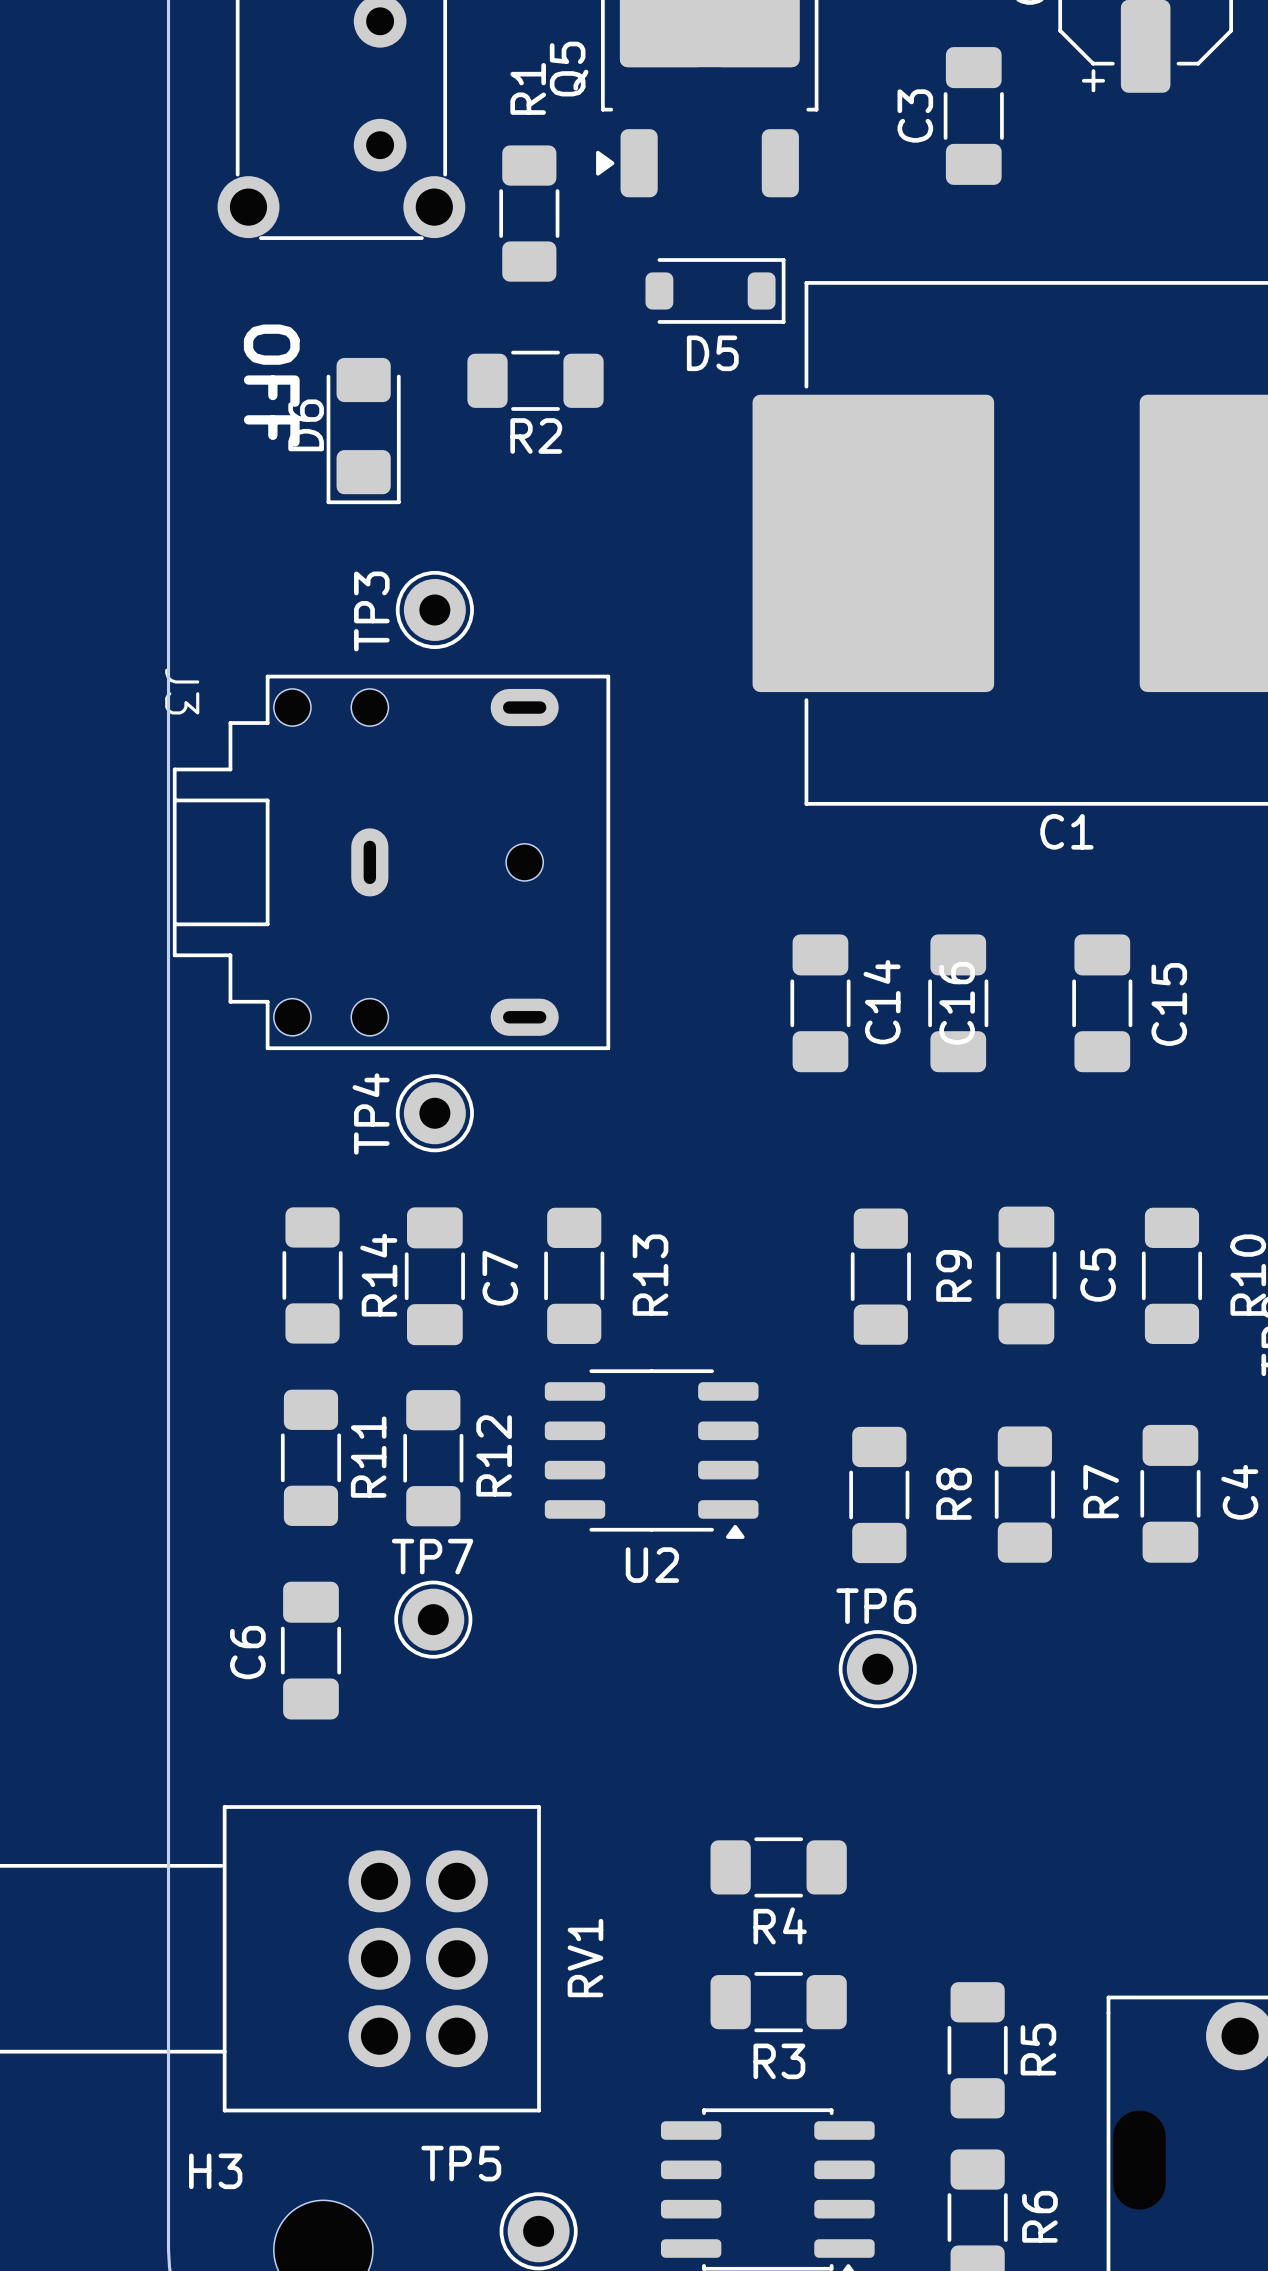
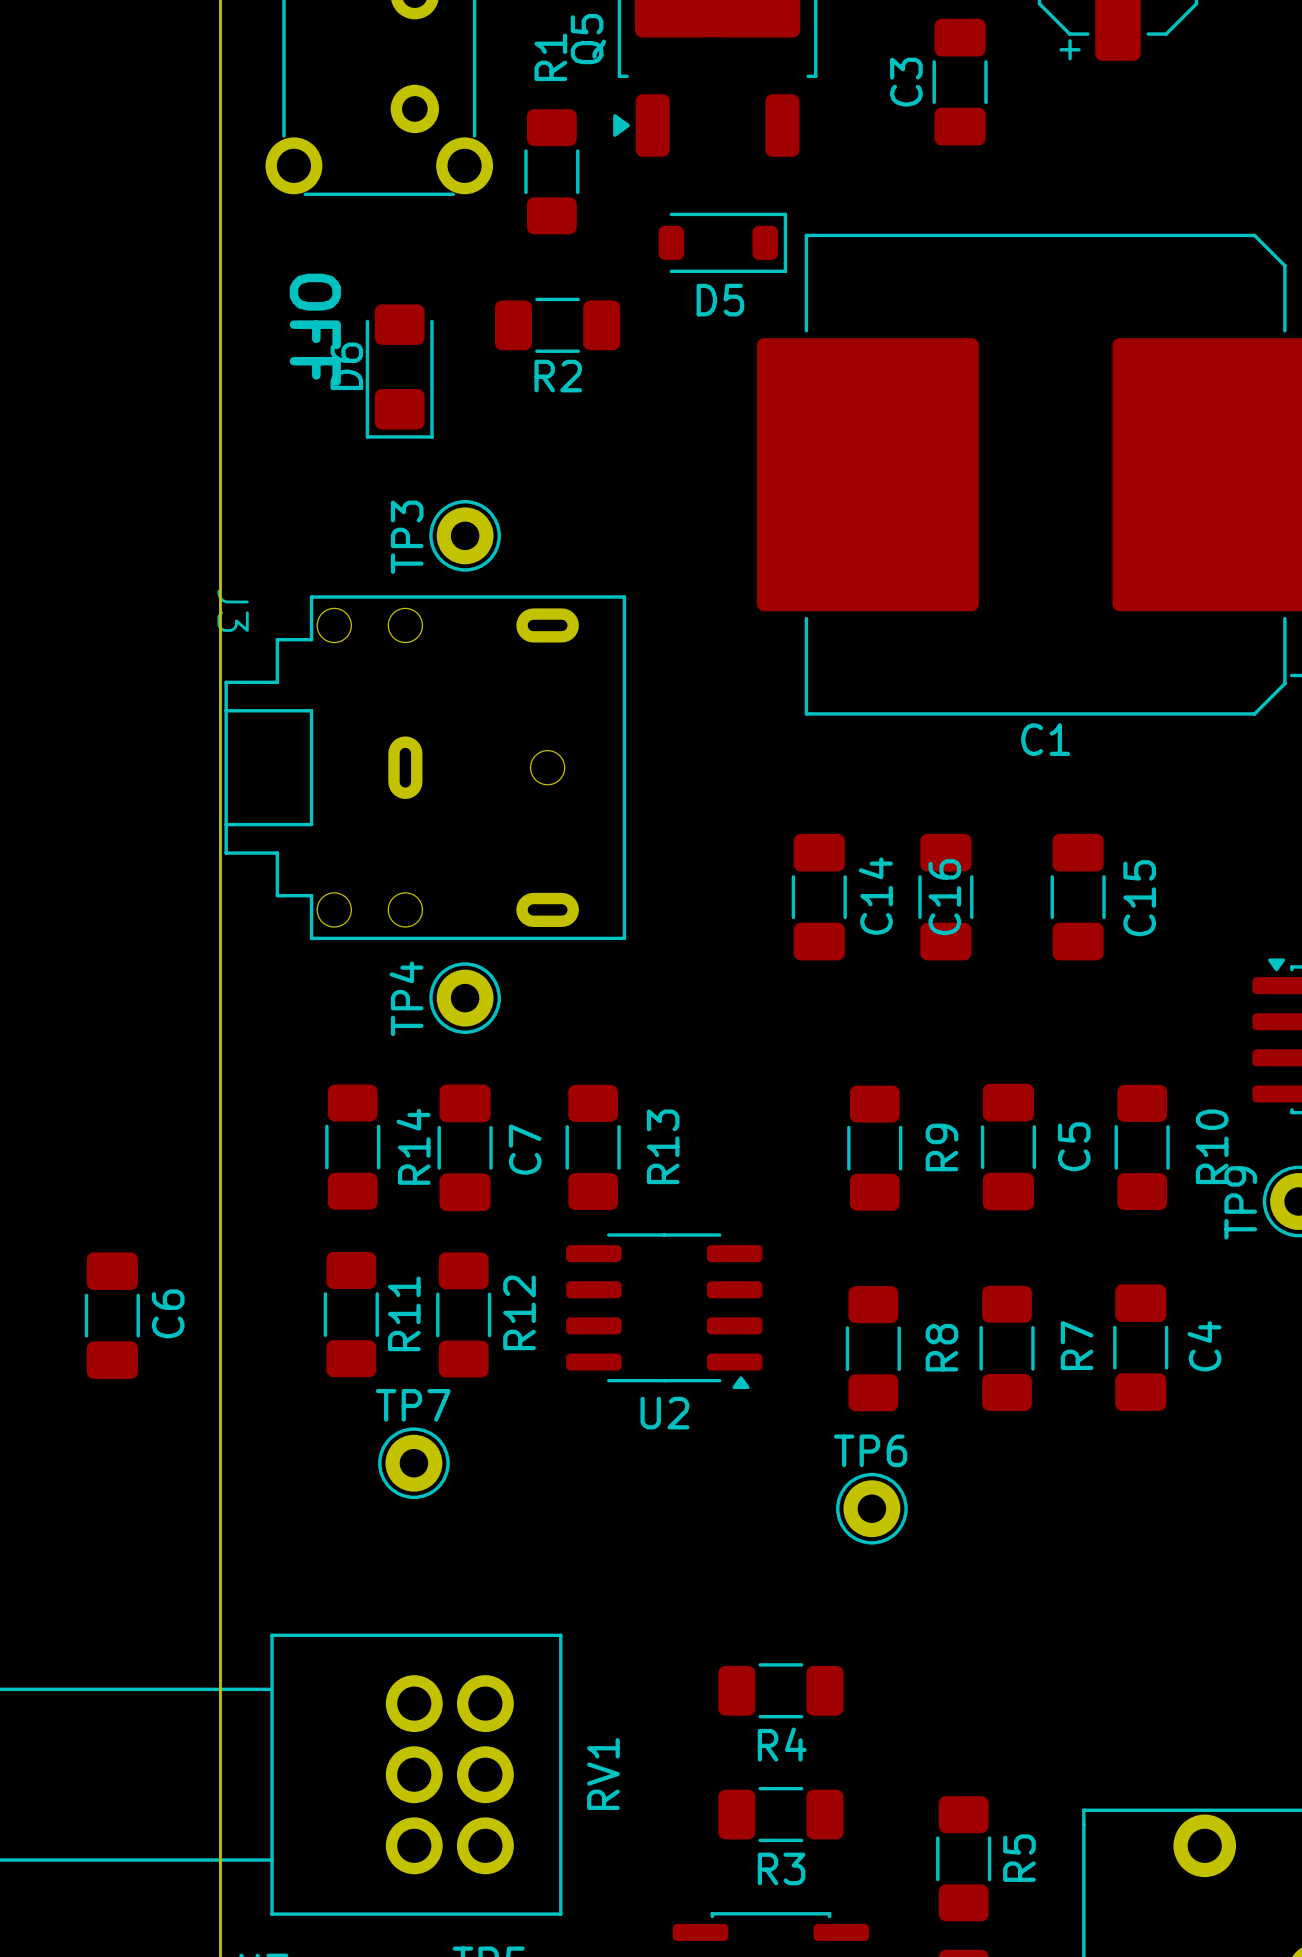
TP7 position: (433, 1619) -> (413, 1463)
C6 position: (310, 1650) -> (112, 1315)
C6 name position: C6 (247, 1652) -> C6 (168, 1313)

